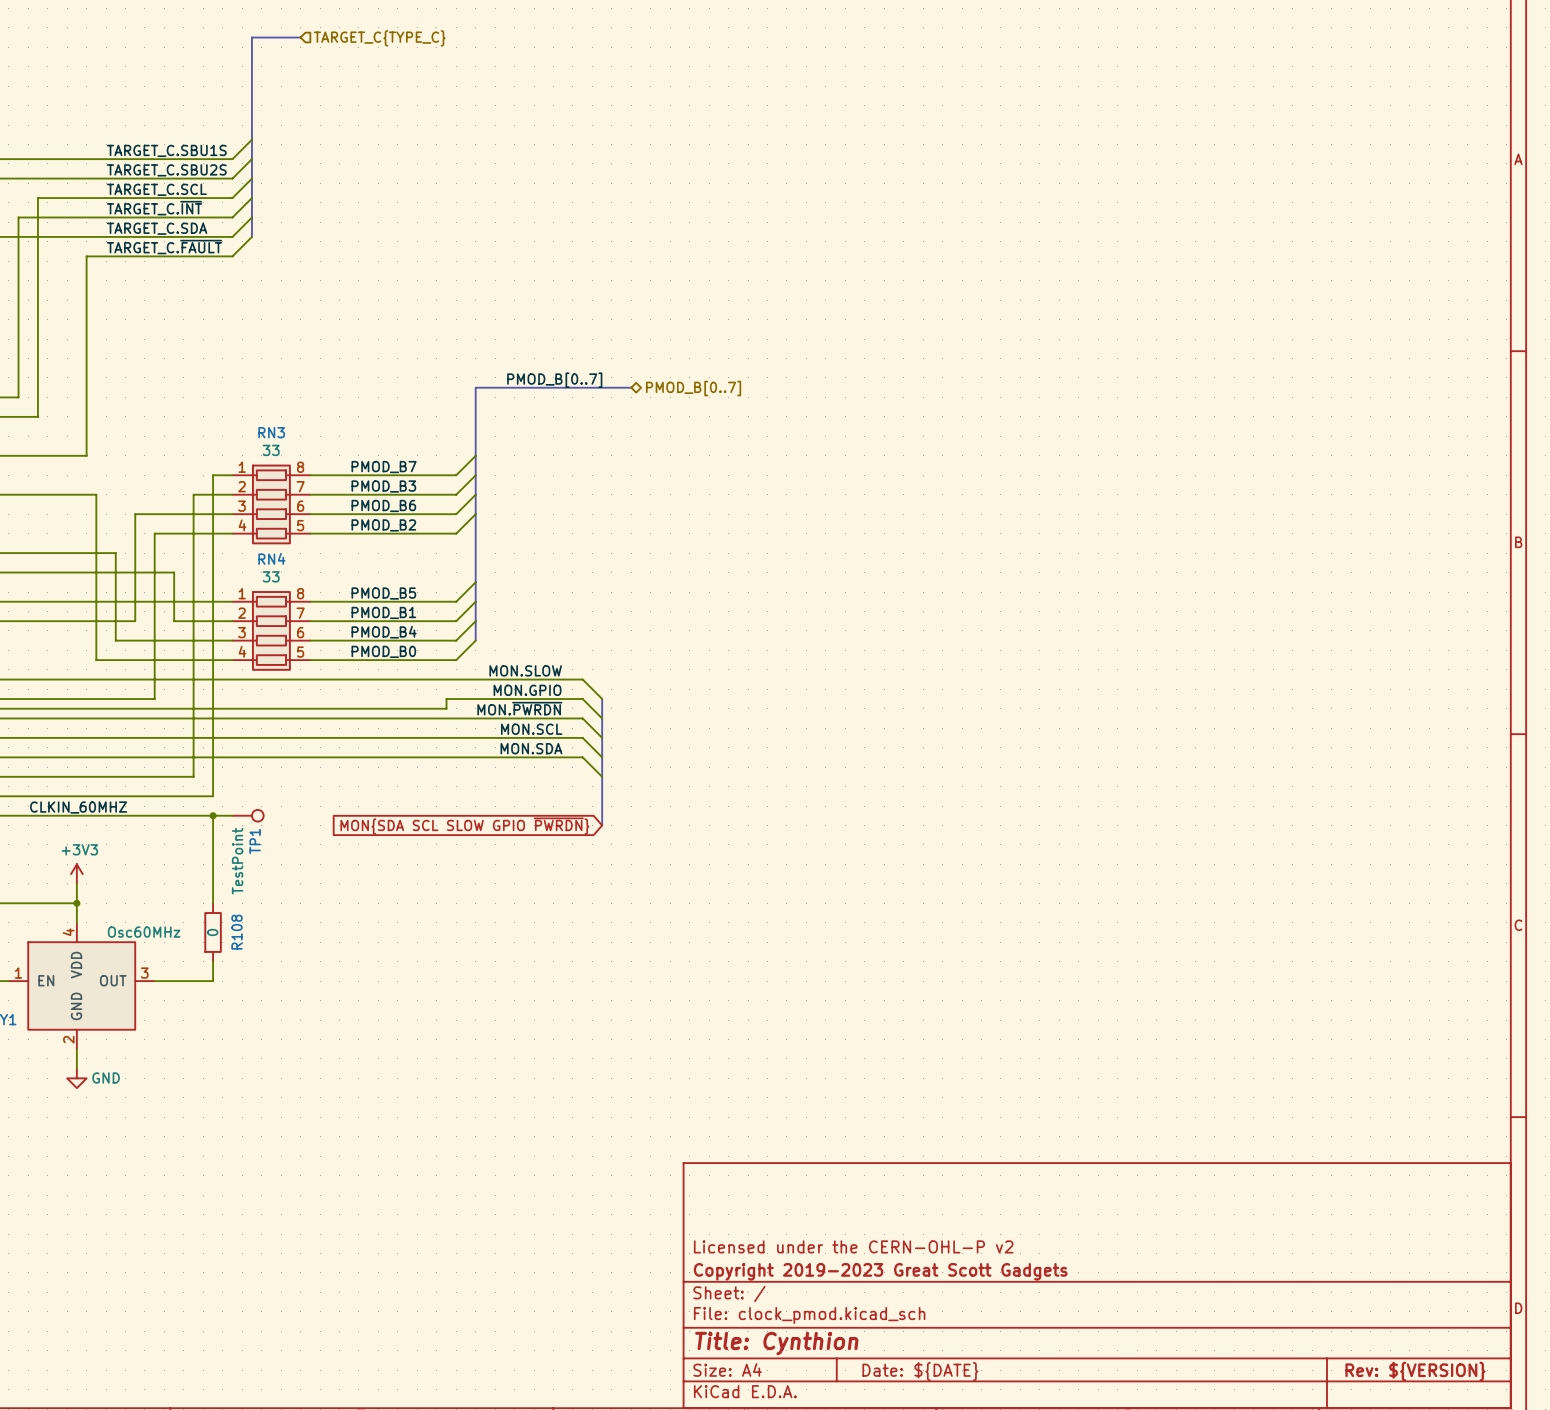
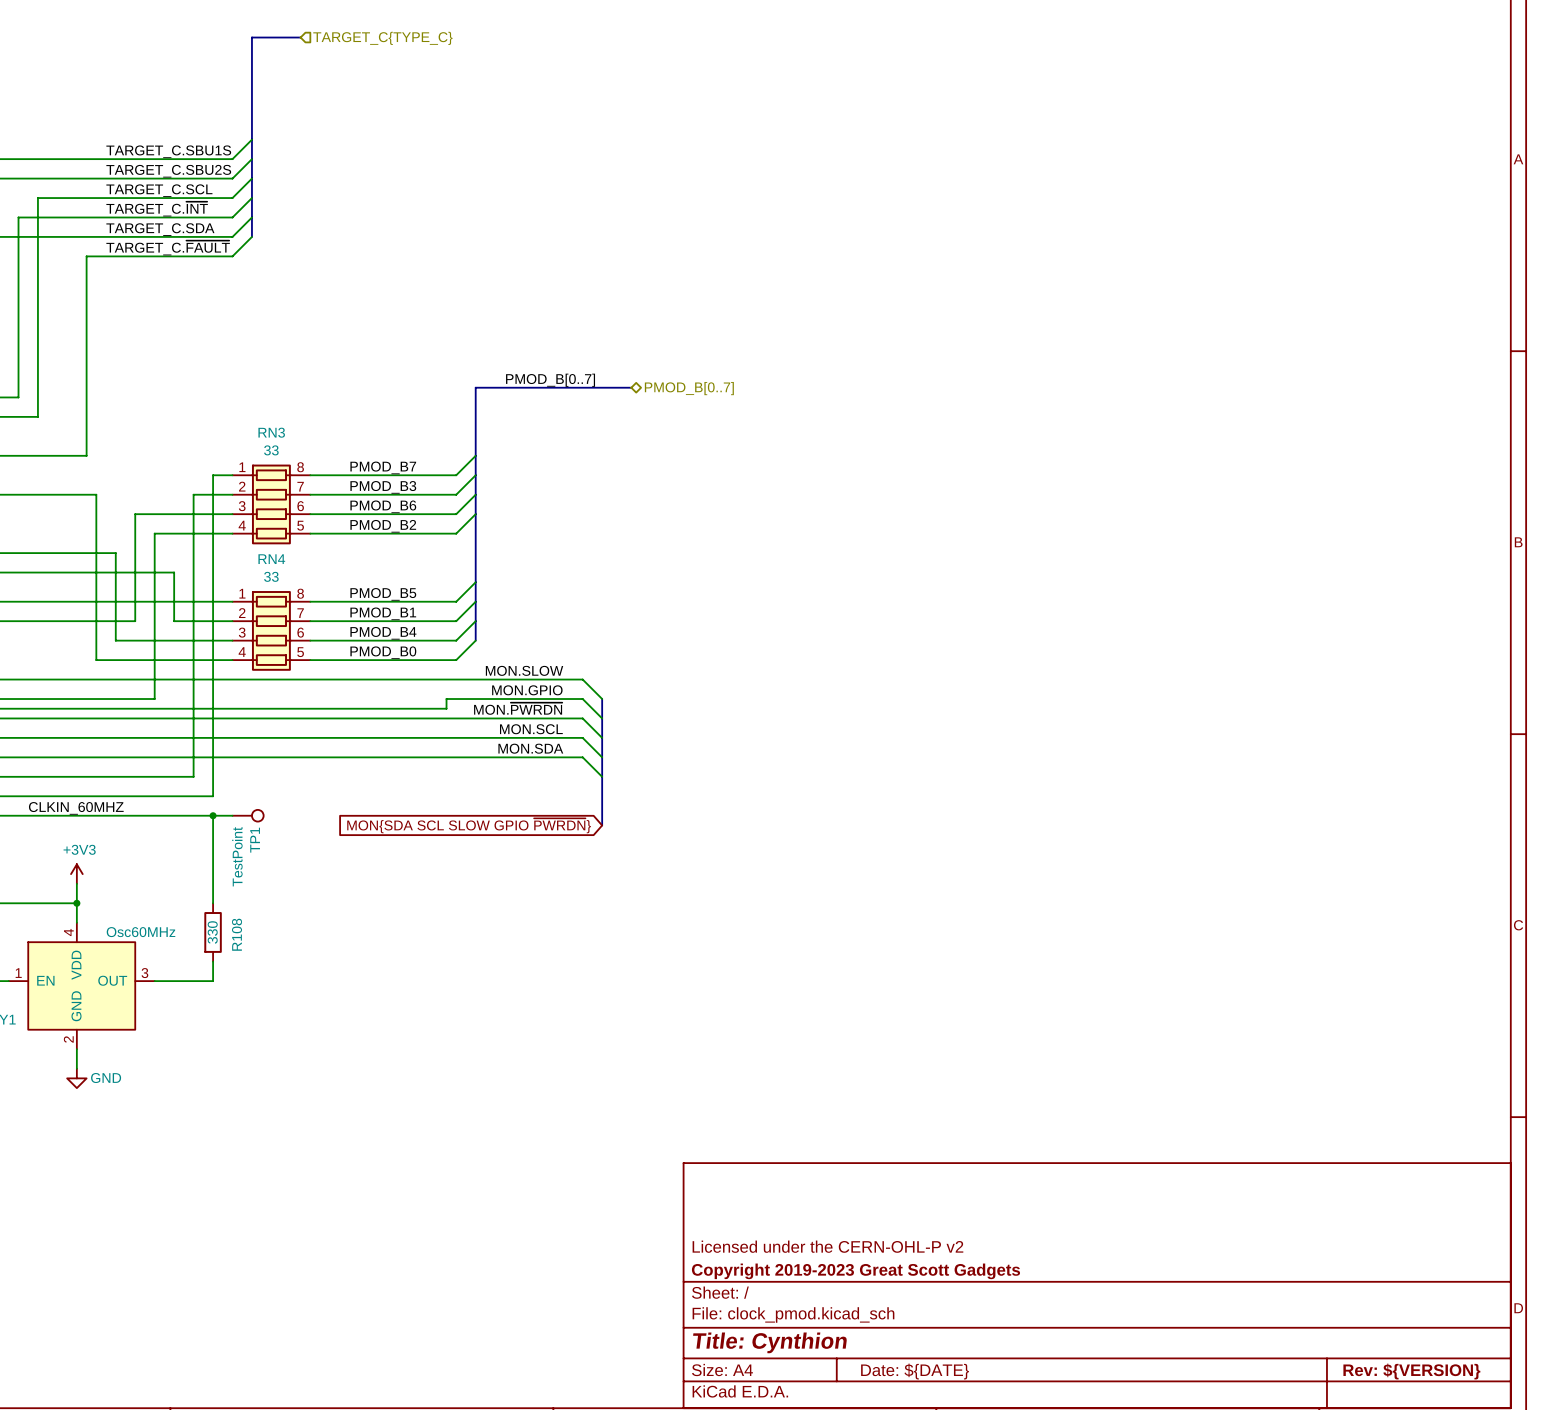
R108 value: 0 (212, 932) -> 330 (212, 932)

